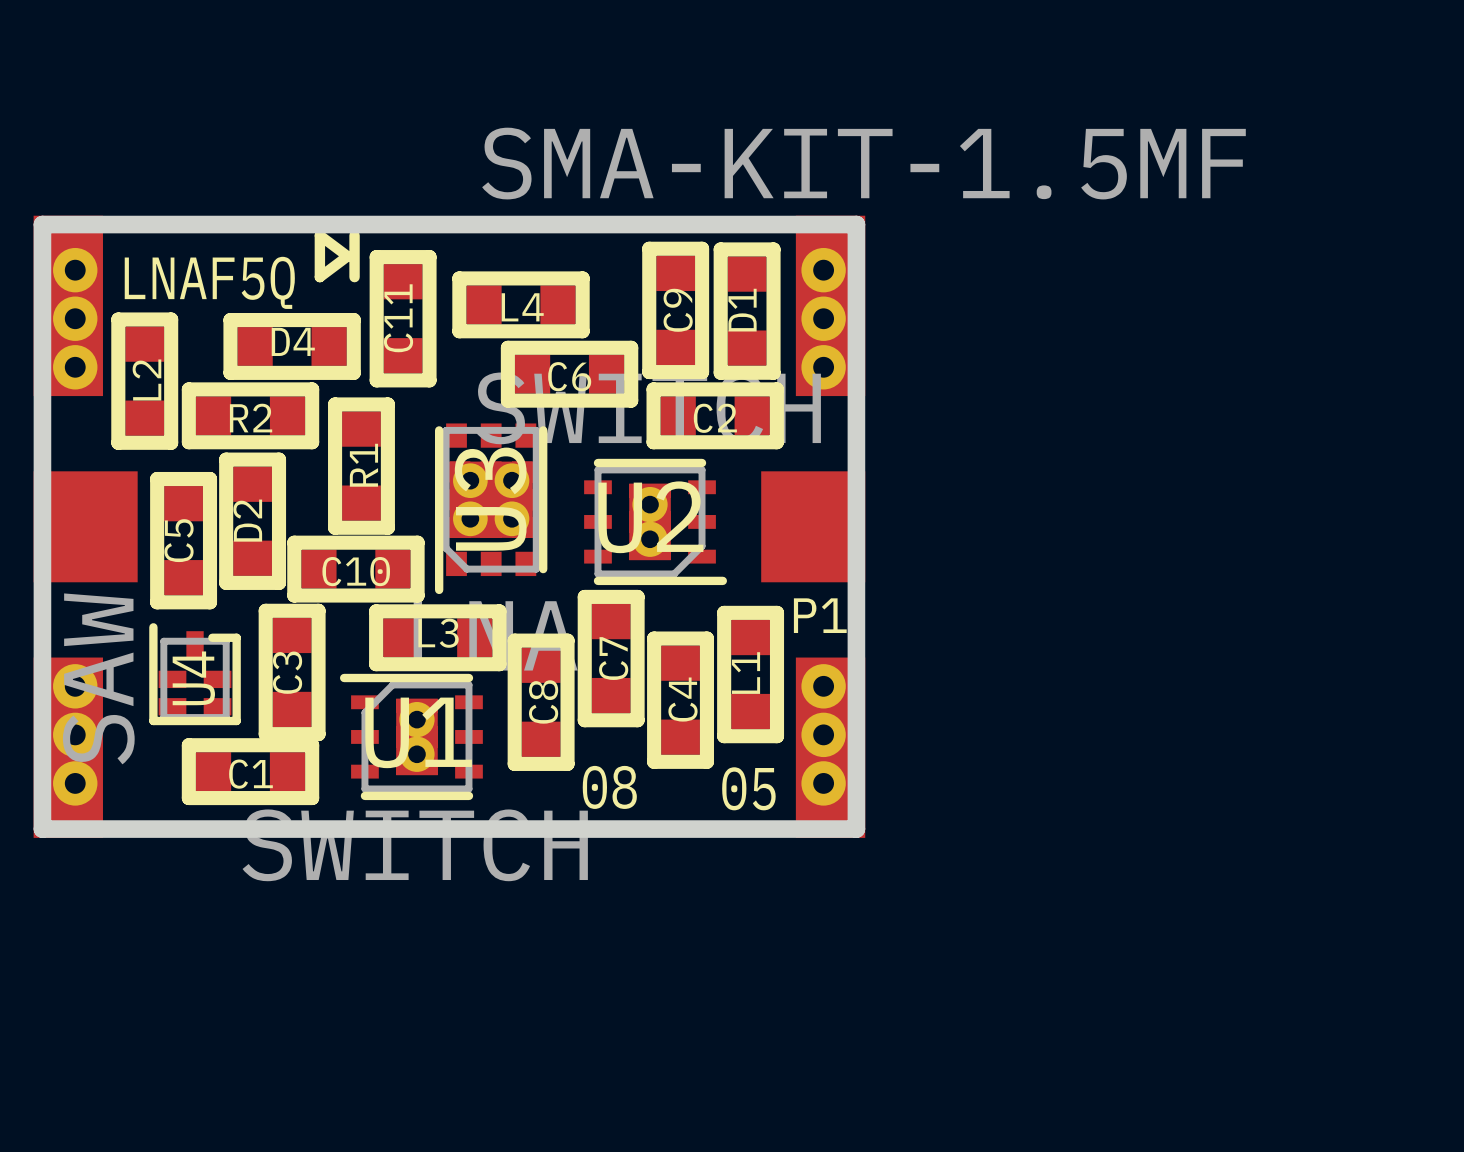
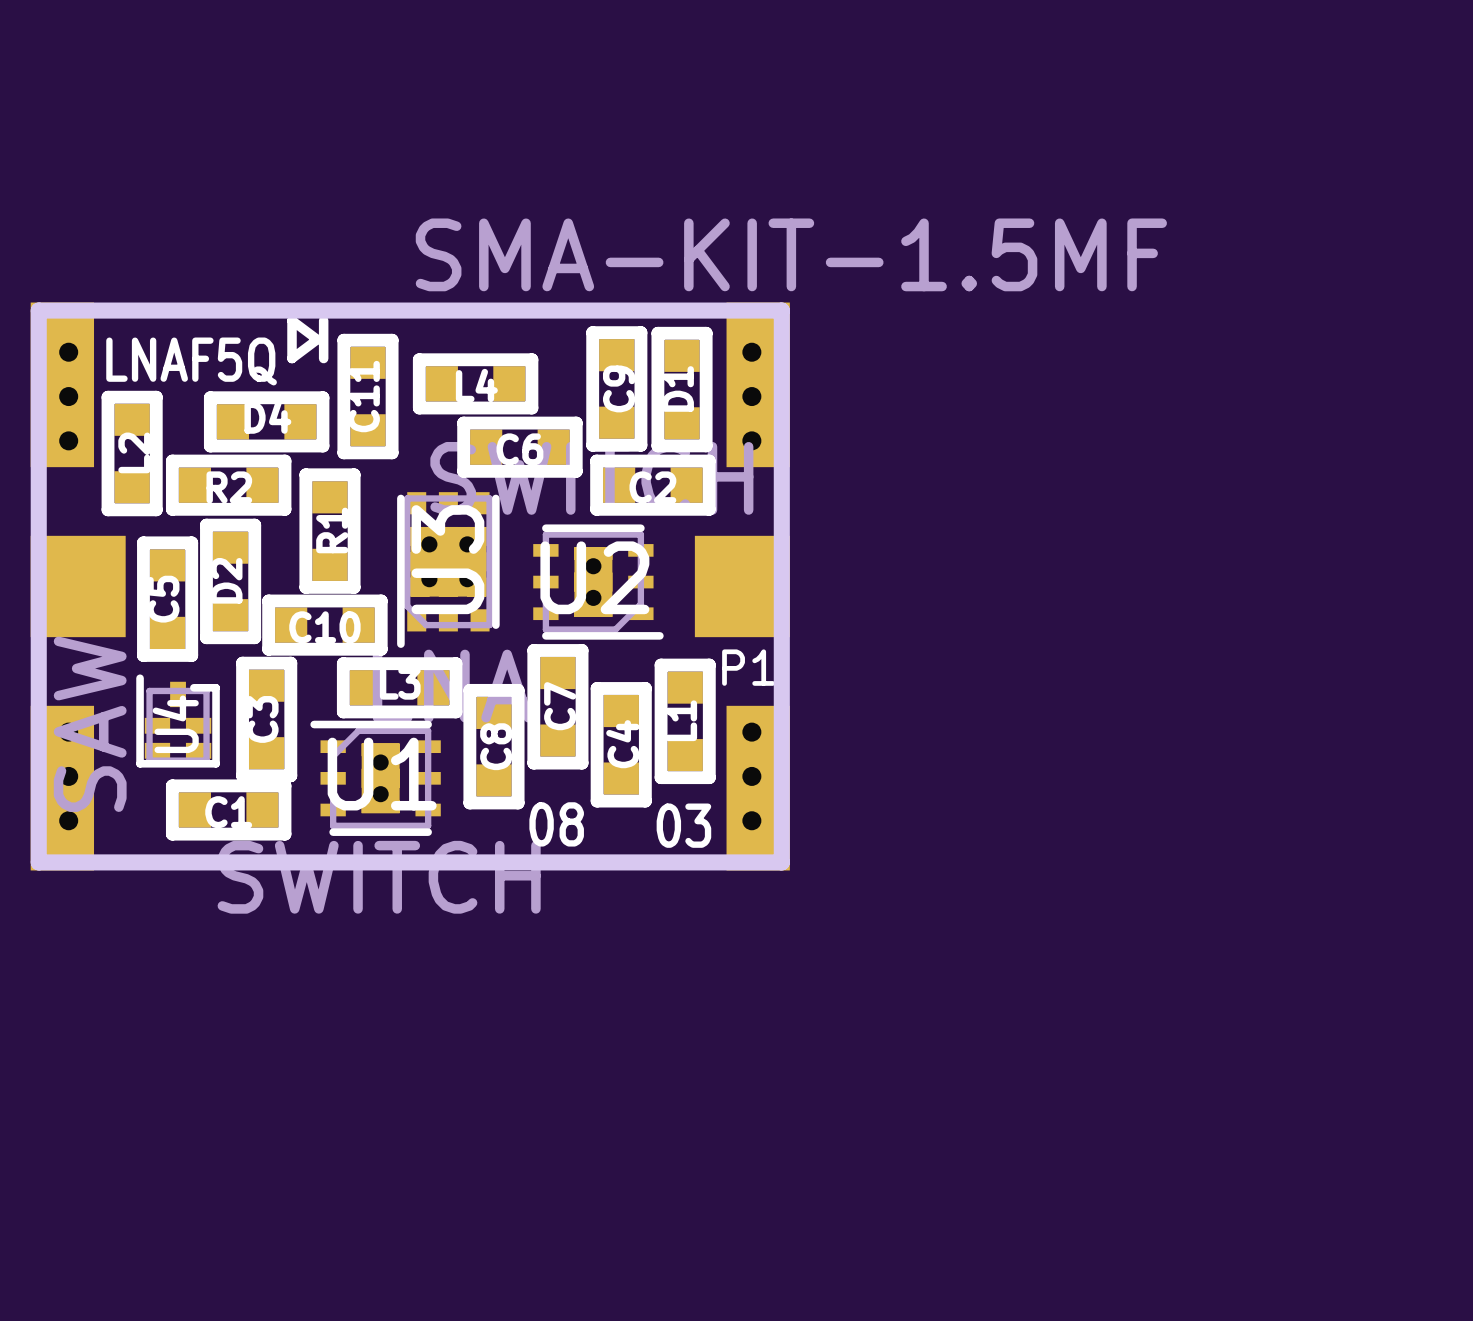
text: 05 (748, 788) -> 03 (683, 825)

